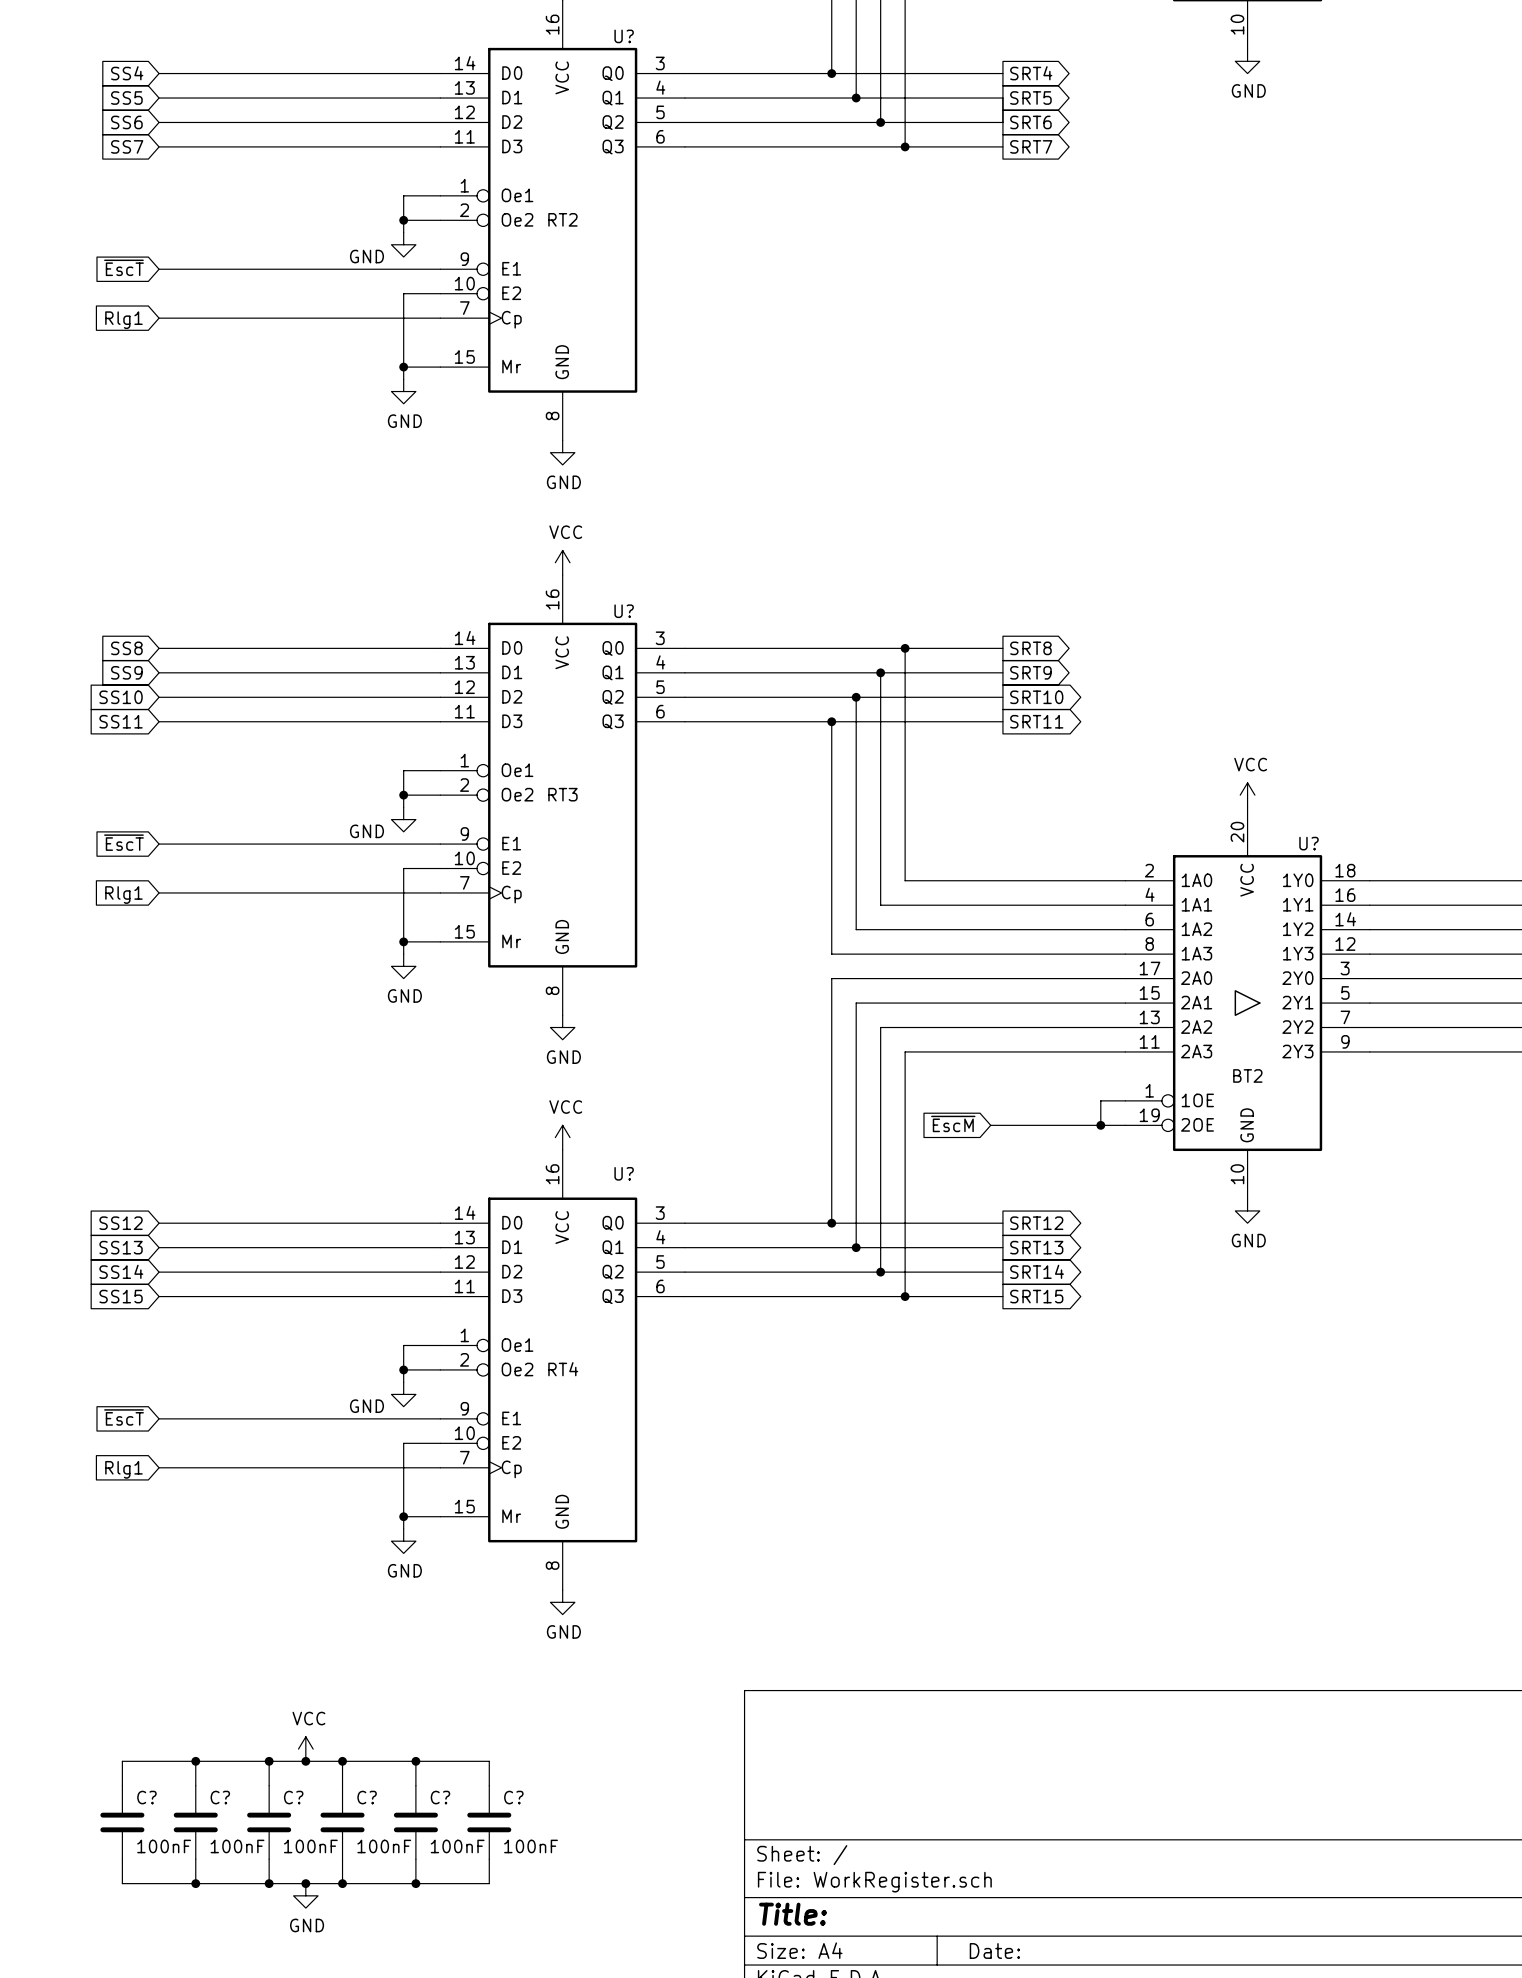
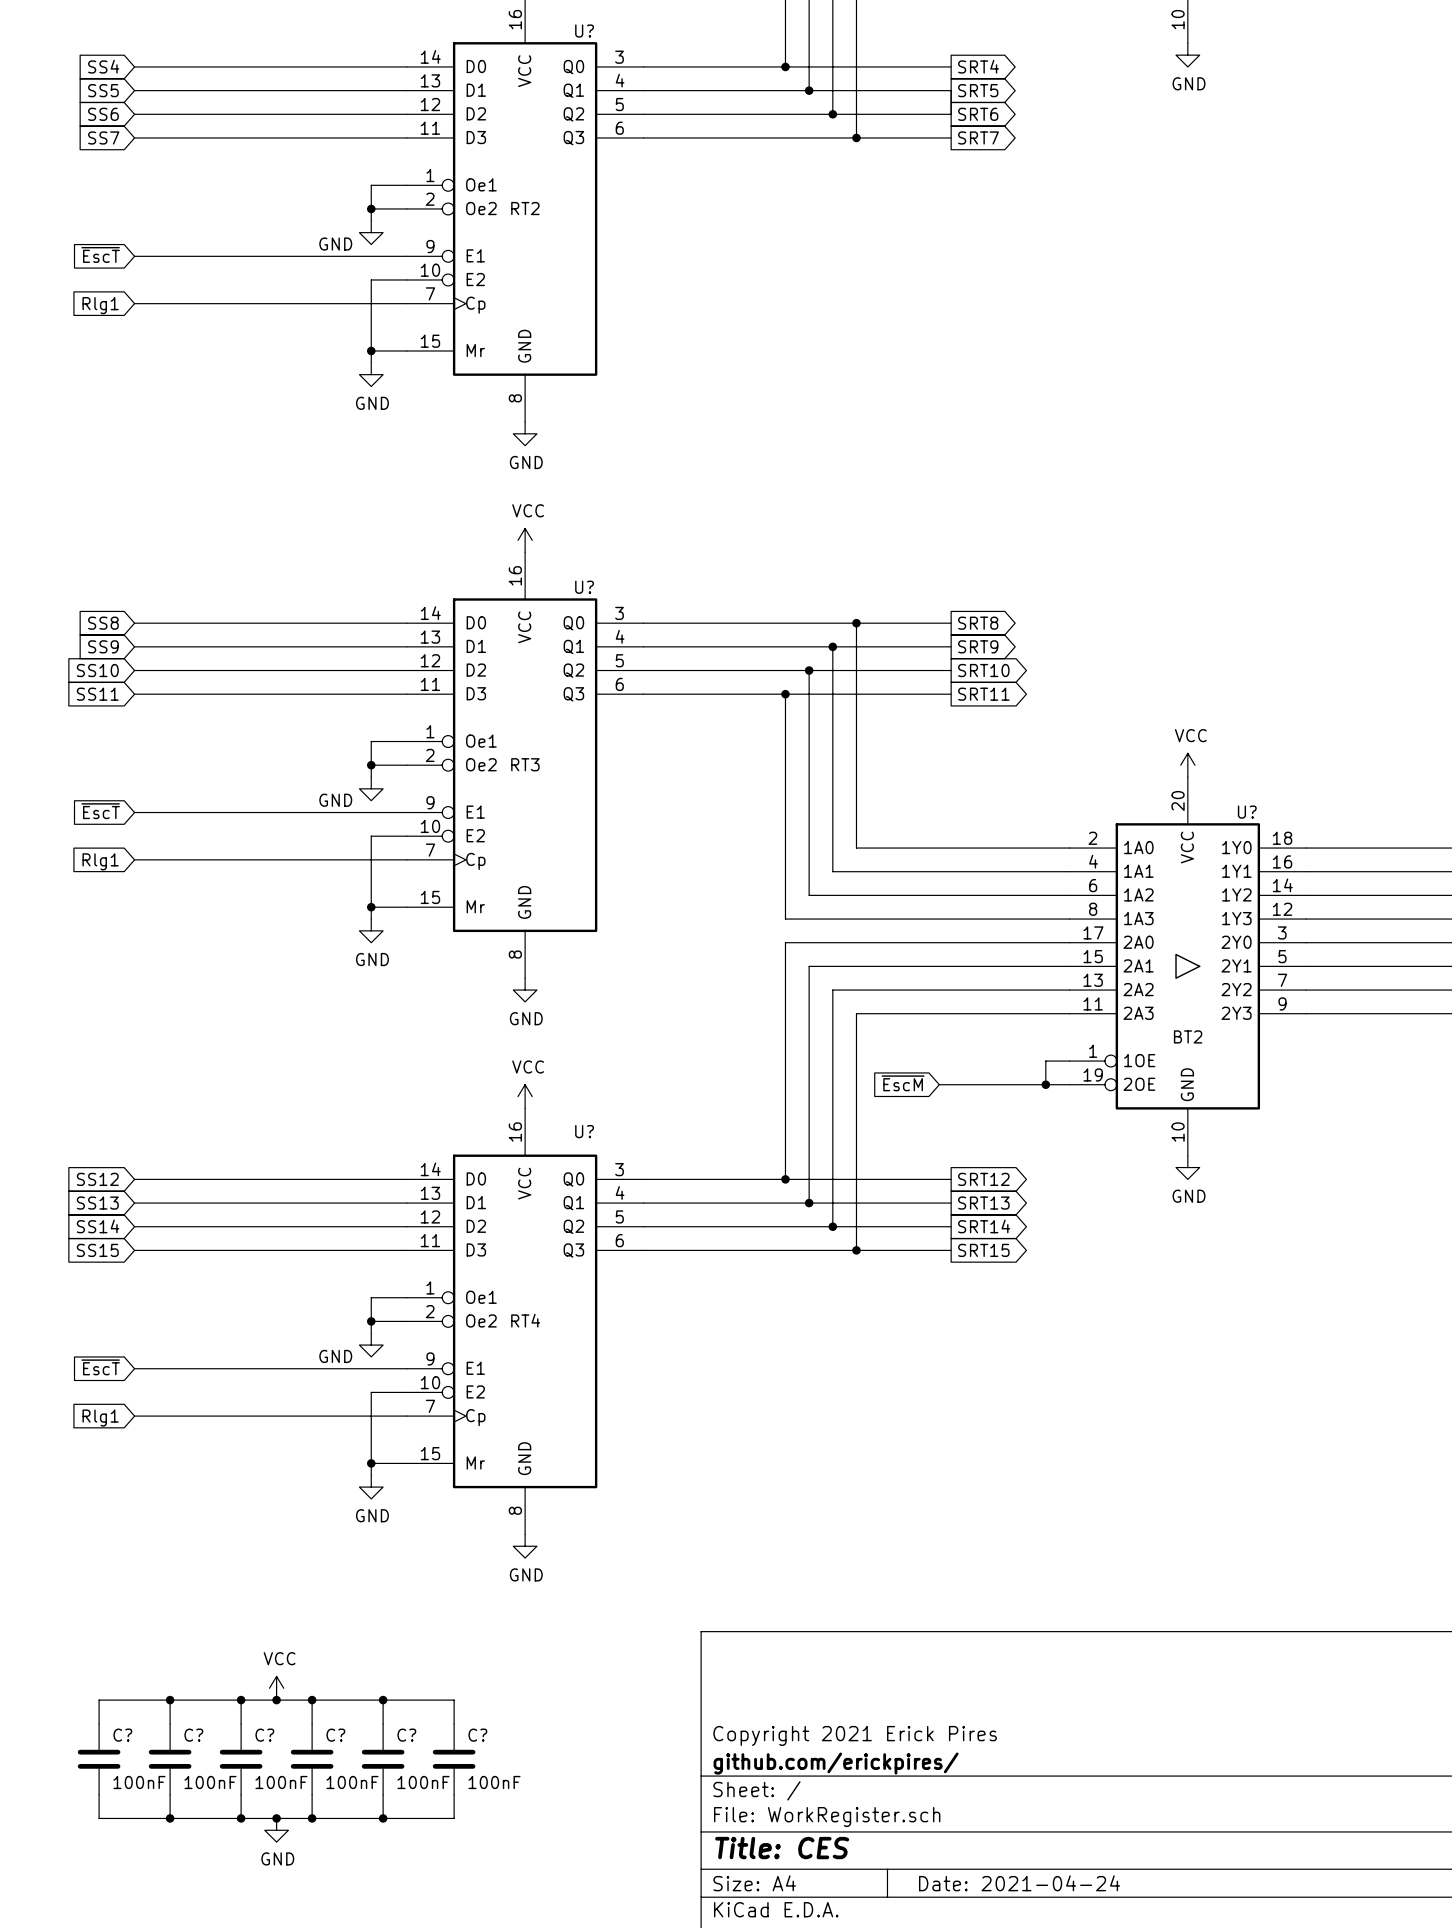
title block: none -> Copyright 2021 Erick Pires (855, 1735)
title block: none -> github.com/erickpires/ (836, 1763)
title block: Title: (793, 1914) -> Title: CES (782, 1848)
title block: Date: (994, 1950) -> Date: 2021-04-24 (1019, 1883)

